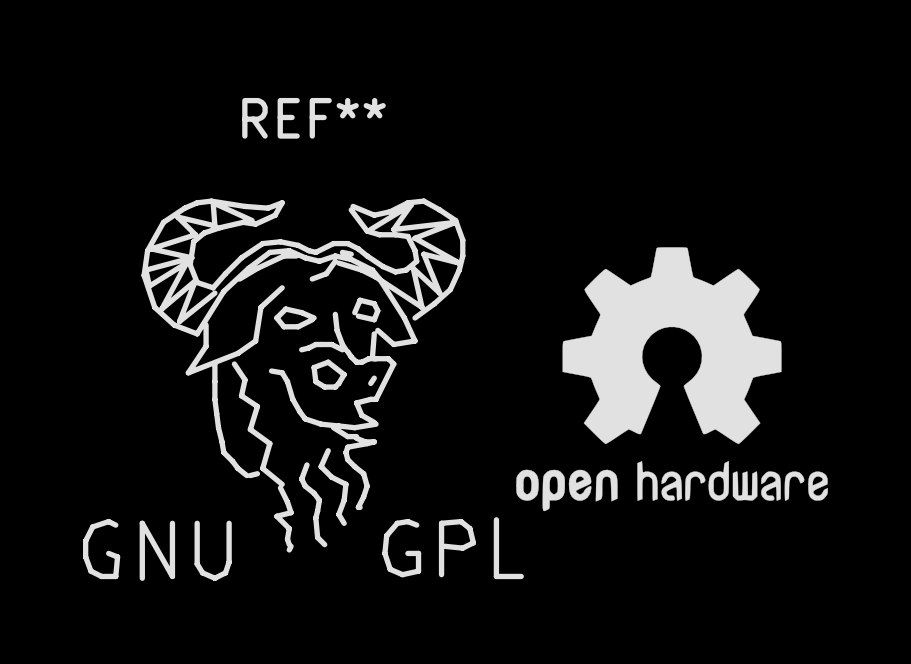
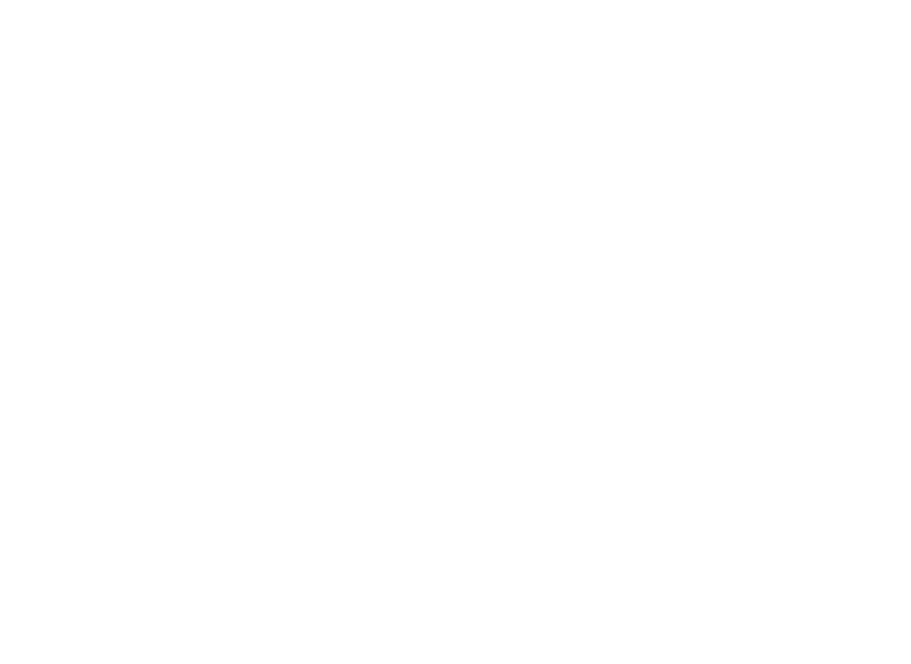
drawing: [516, 247, 828, 512] -> none
REF**: (303, 389) -> none

